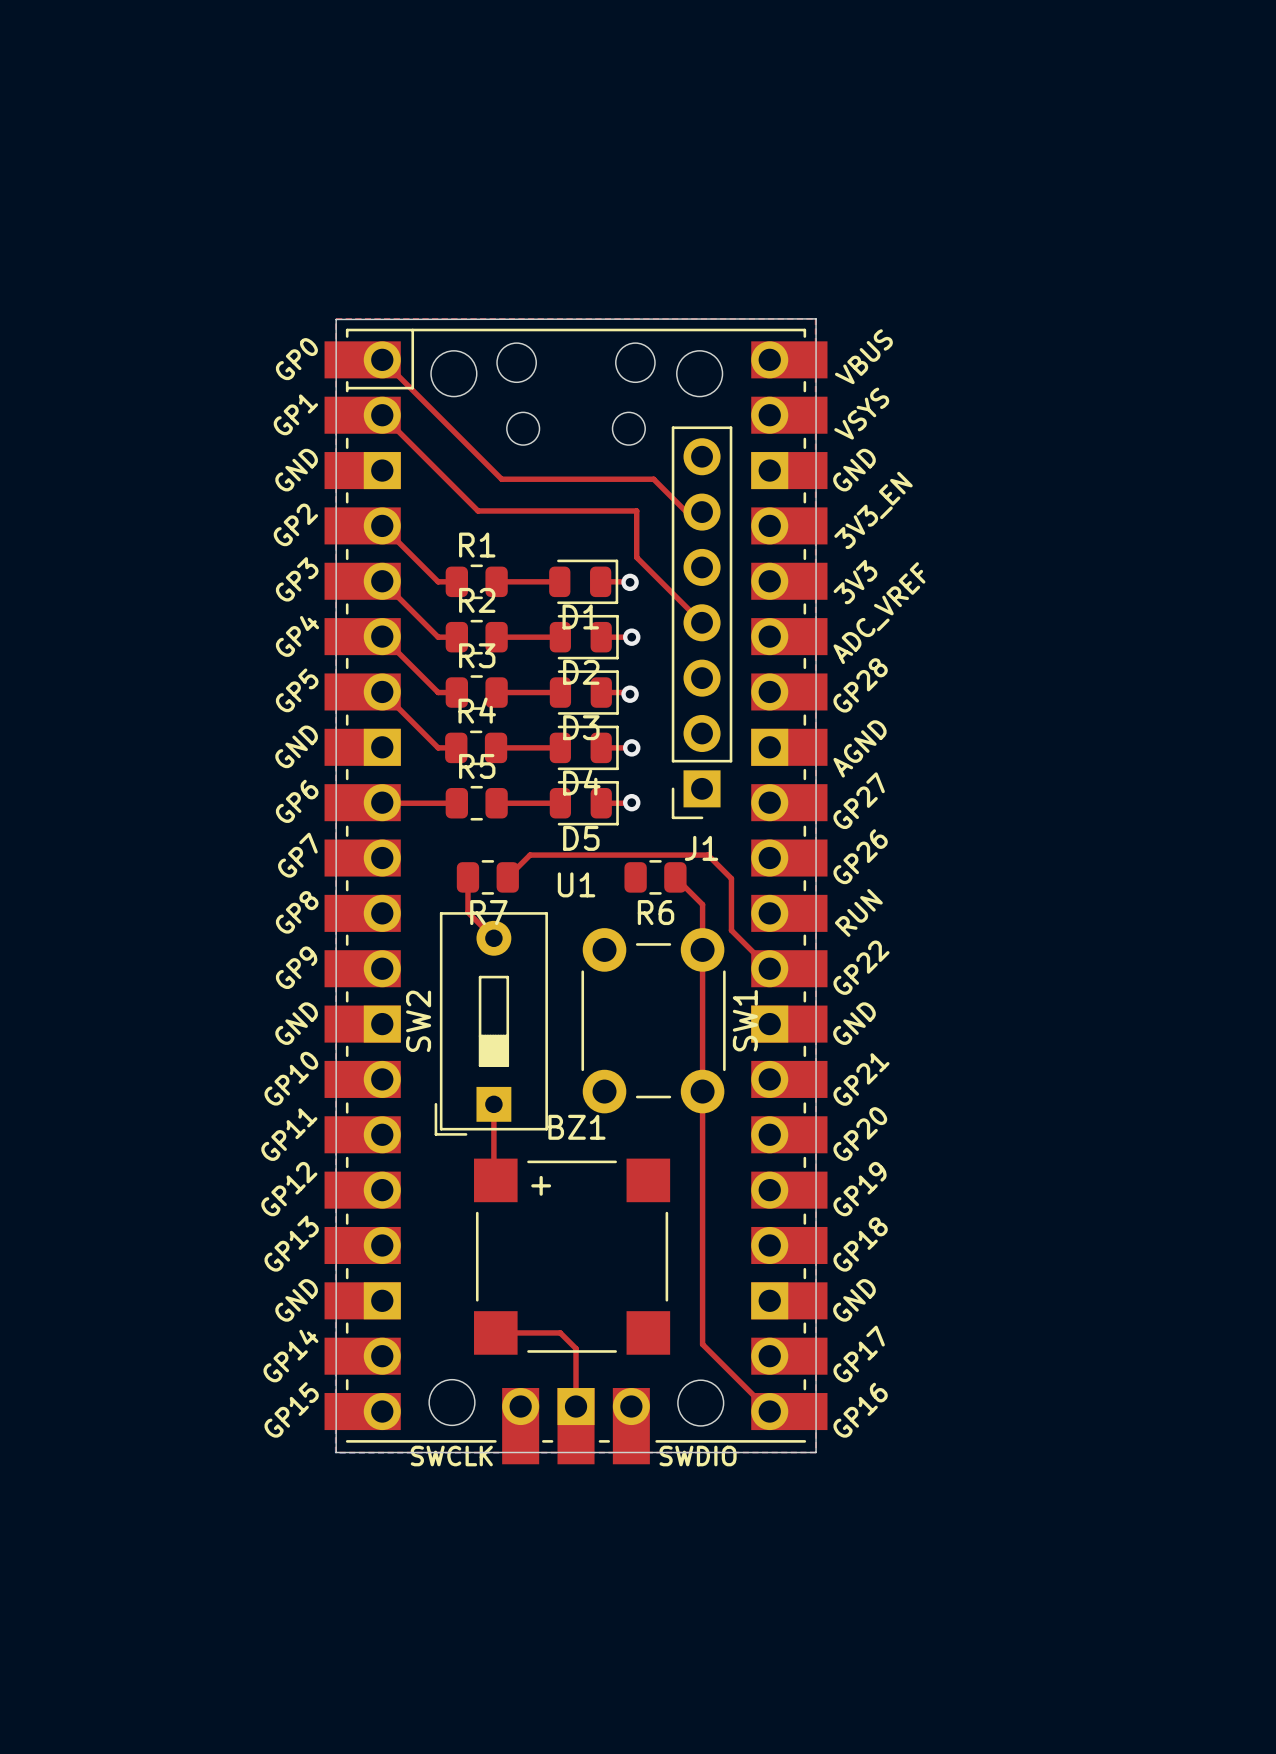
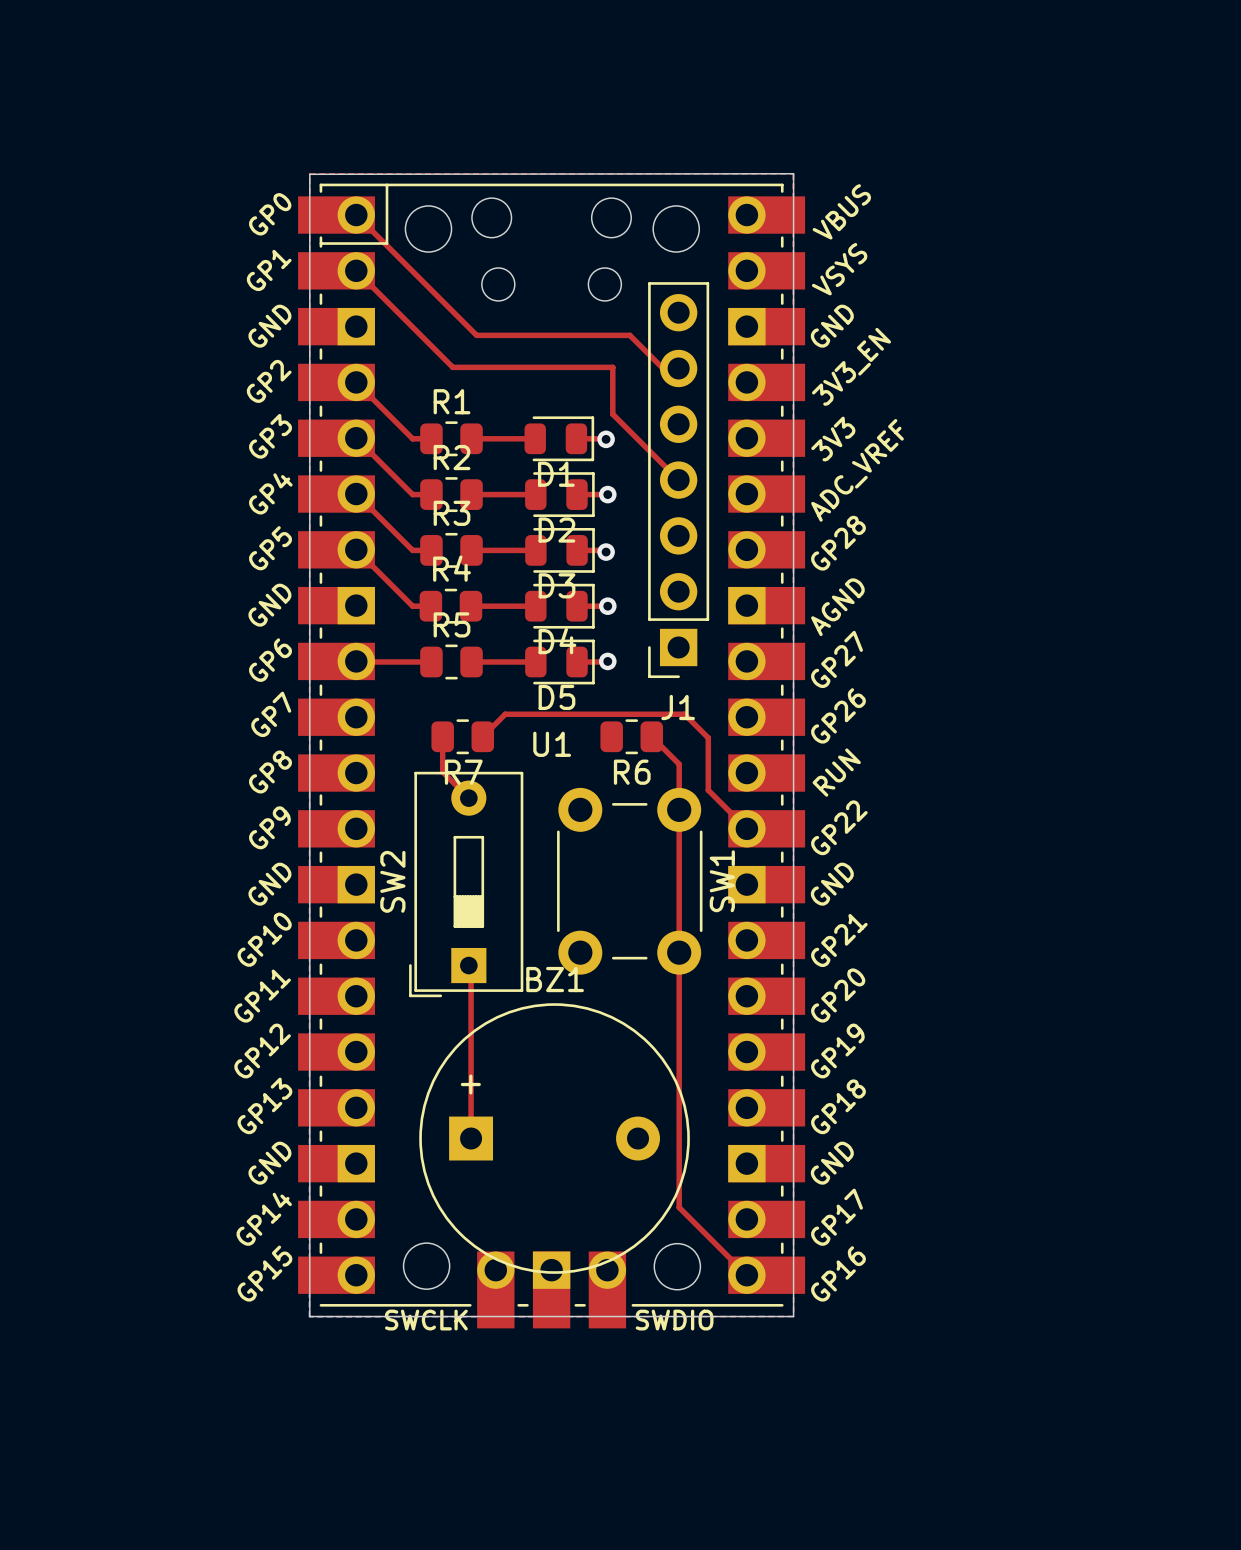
top track: (493, 1104) (493, 1178) (495, 1180) -> none
top track: none -> (471, 973) (471, 1138)
BZ1 footprint: [474, 1158, 671, 1355] -> [419, 1003, 690, 1274]
top track: (495, 1332) (560, 1332) (576, 1348) (576, 1406) -> none

